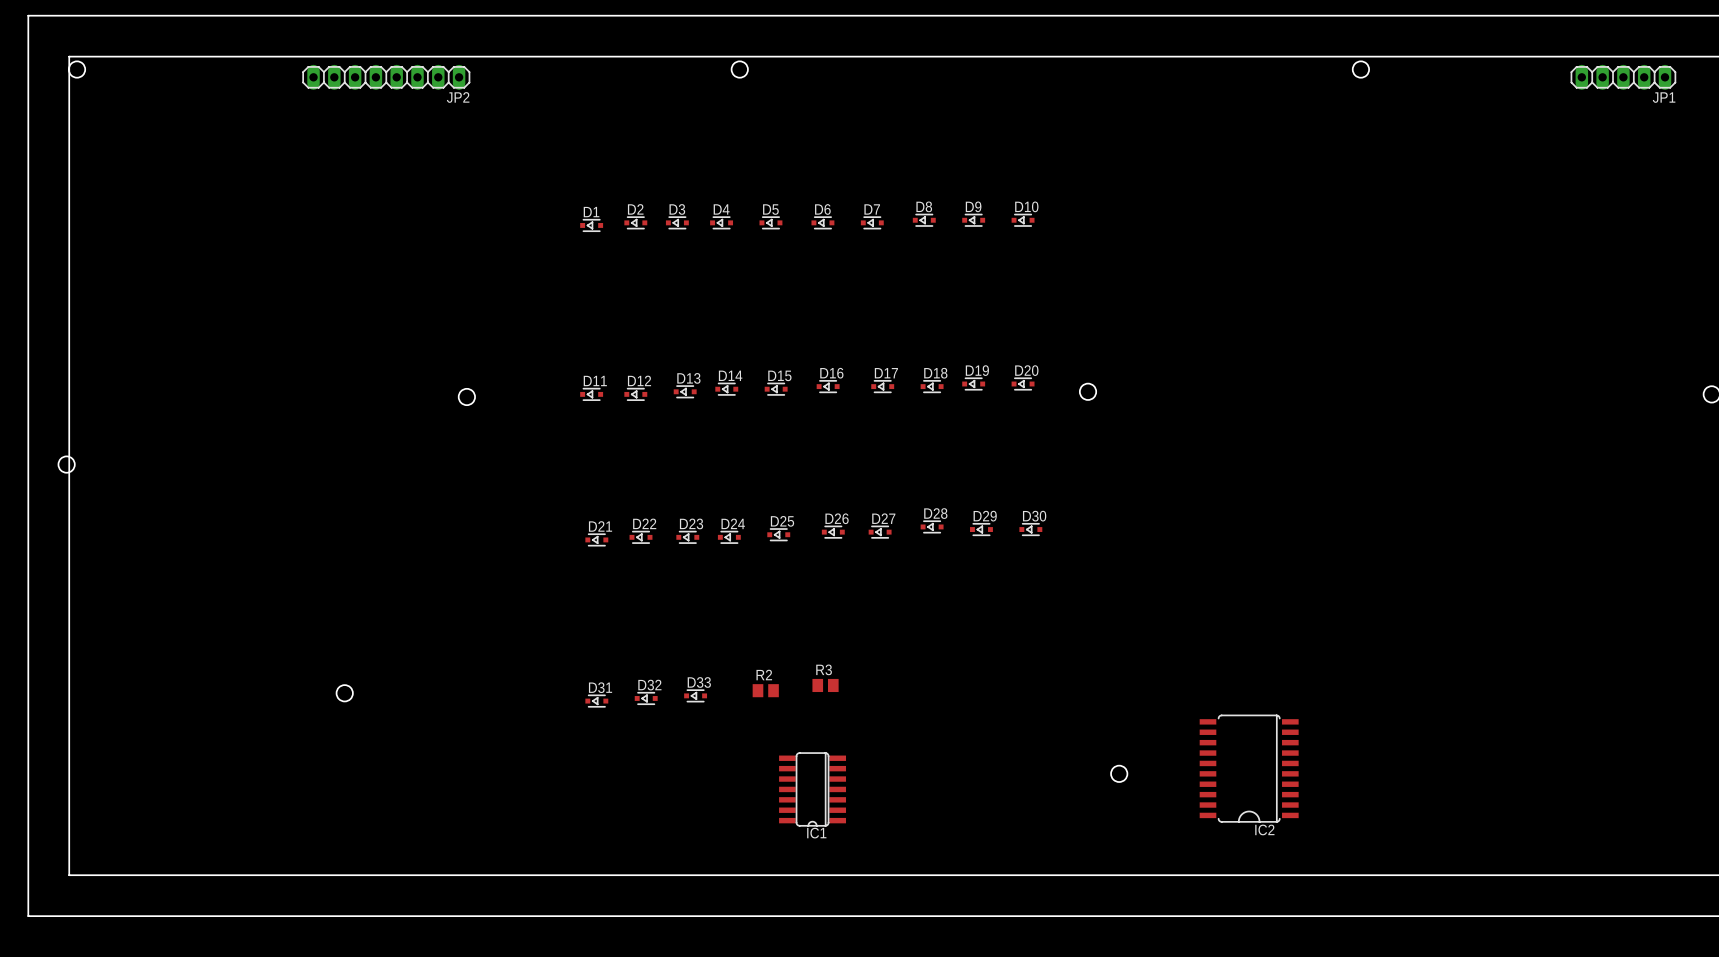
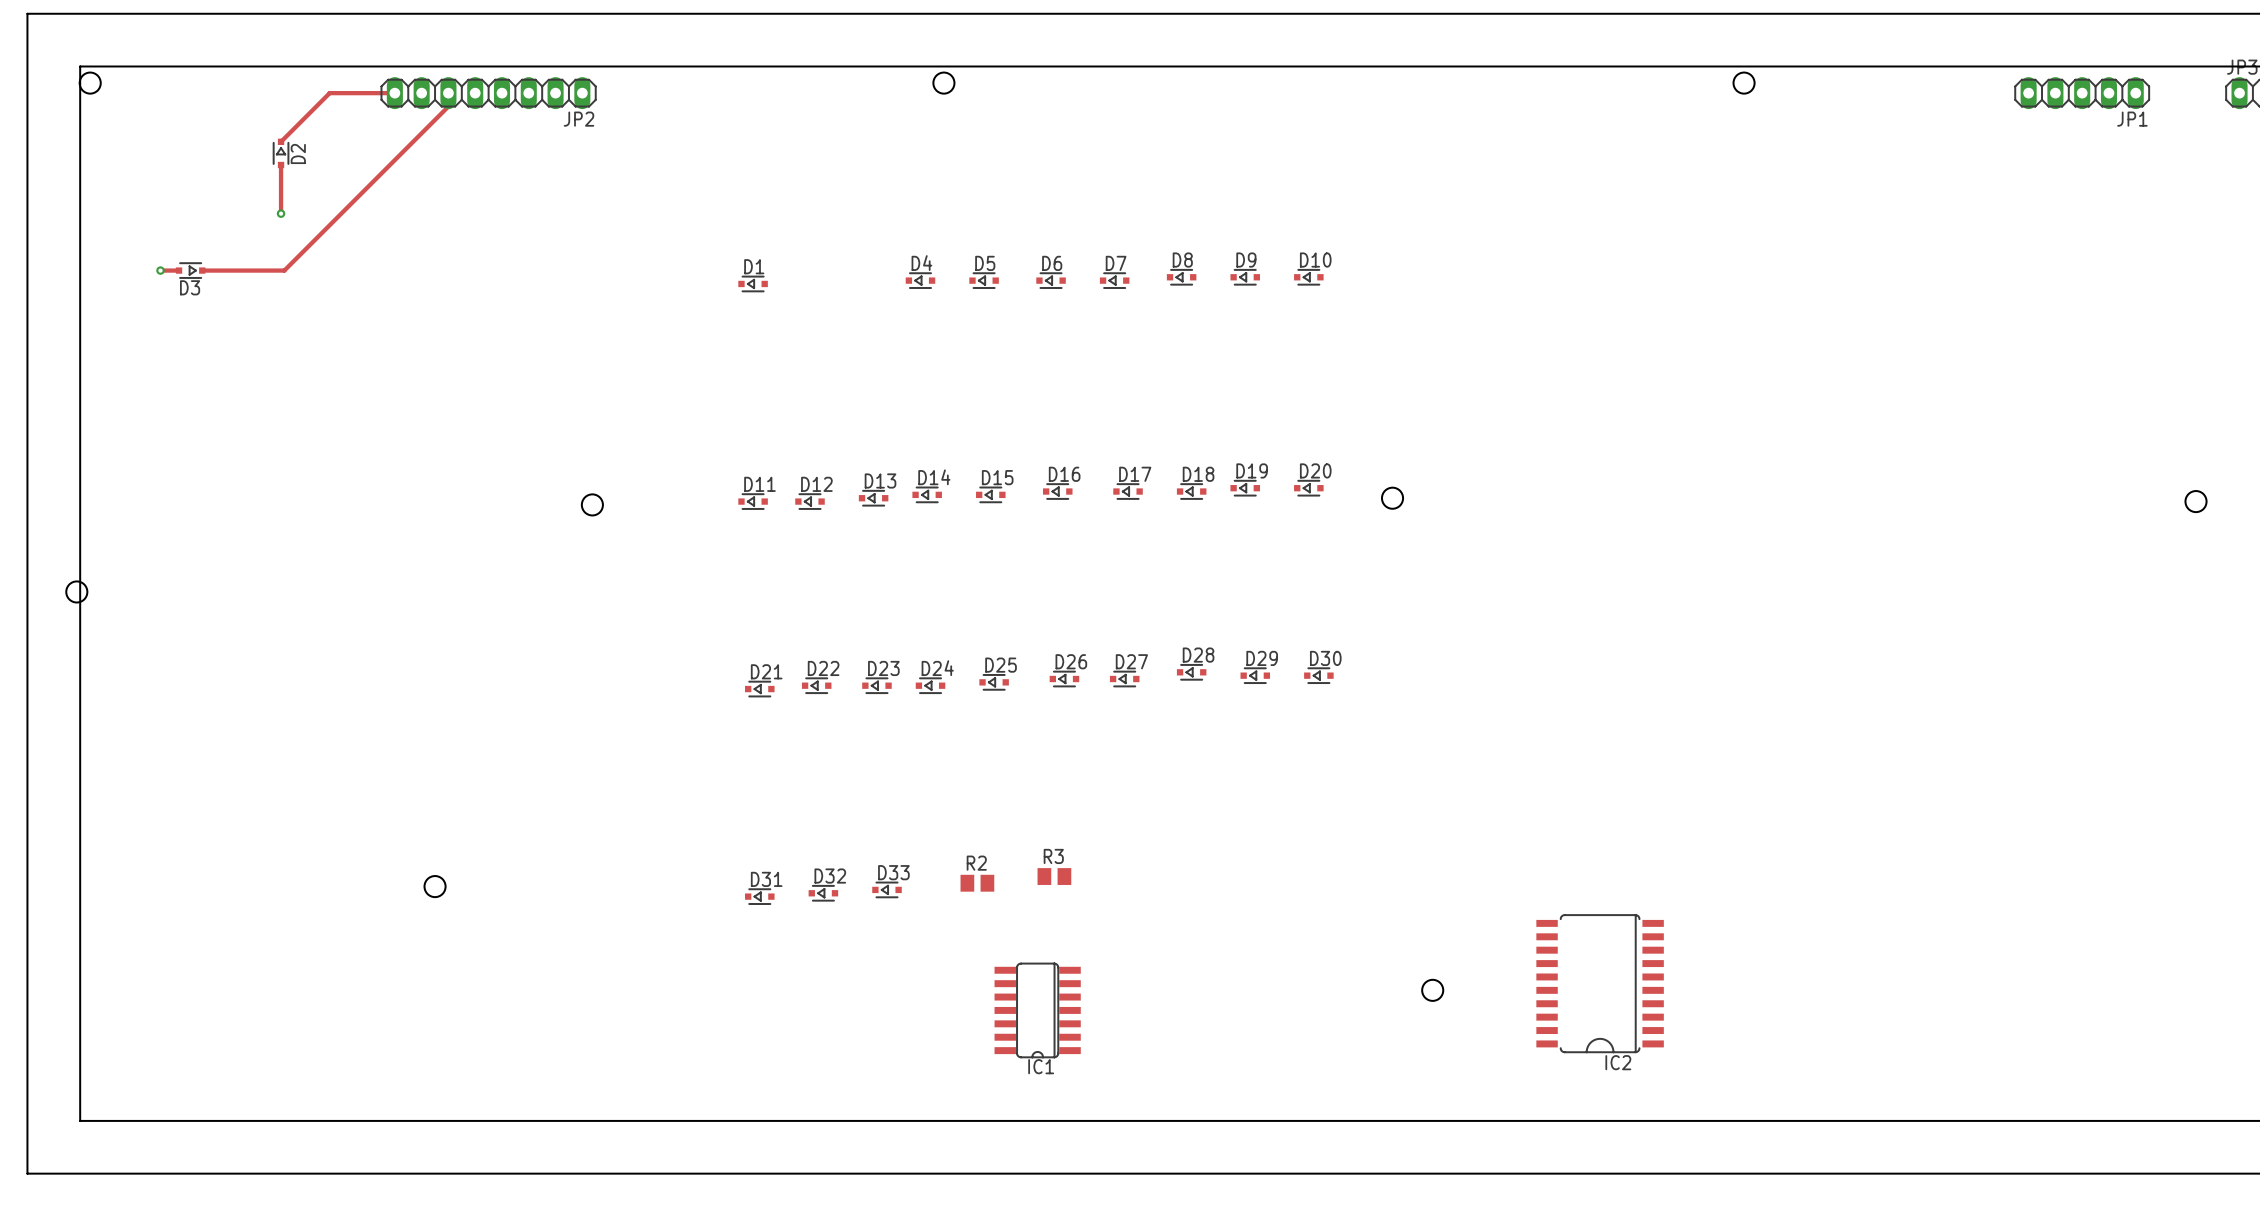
track: none -> (394, 93) (329, 93) (281, 141)
track: none -> (448, 93) (448, 106) (284, 270) (202, 270)
track: none -> (281, 164) (281, 213)
via: none -> (281, 213)
track: none -> (160, 270) (179, 270)
via: none -> (160, 270)
D2 rotation: 0° (635, 222) -> 90° clockwise (281, 153)
D2 position: (635, 222) -> (281, 153)
D3 rotation: 0° (677, 222) -> 180° (190, 270)
D3 position: (677, 222) -> (190, 270)

